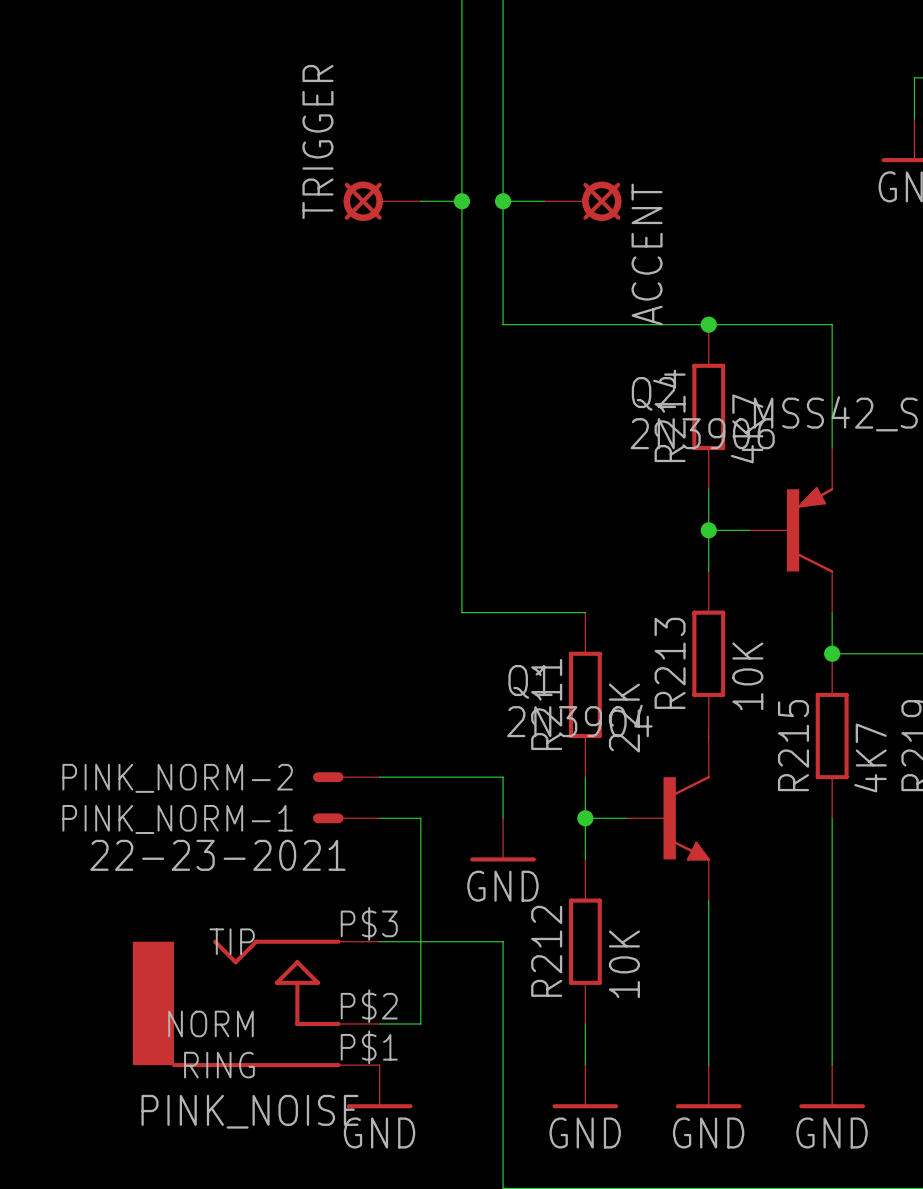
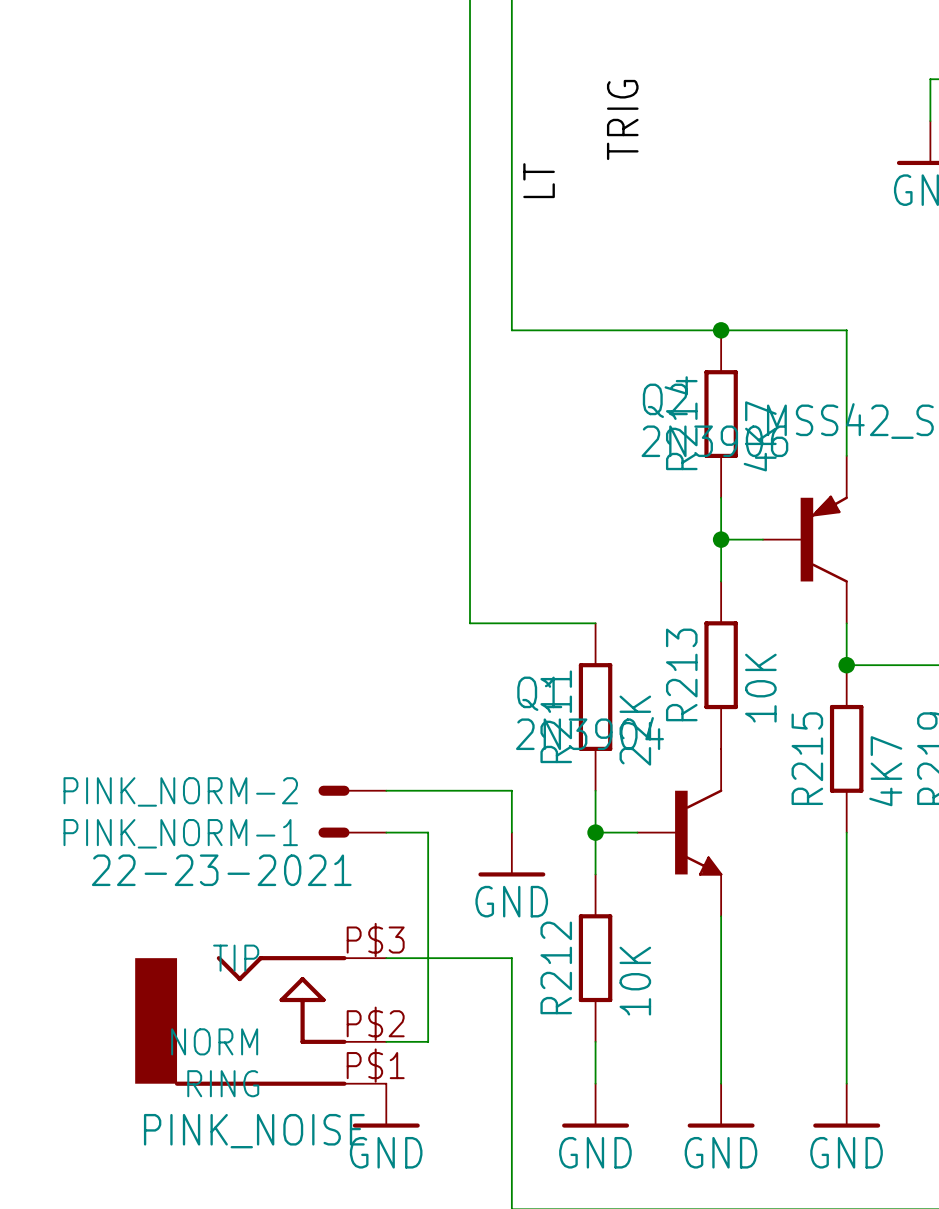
label: none -> TRIG (622, 119)
label: none -> LT (539, 180)
TRIGGER: (382, 201) -> none
wire: (420, 201) (461, 201) -> none
junction: (461, 201) -> none
wire: (503, 201) (544, 201) -> none
junction: (503, 201) -> none
ACCENT: (582, 201) -> none

